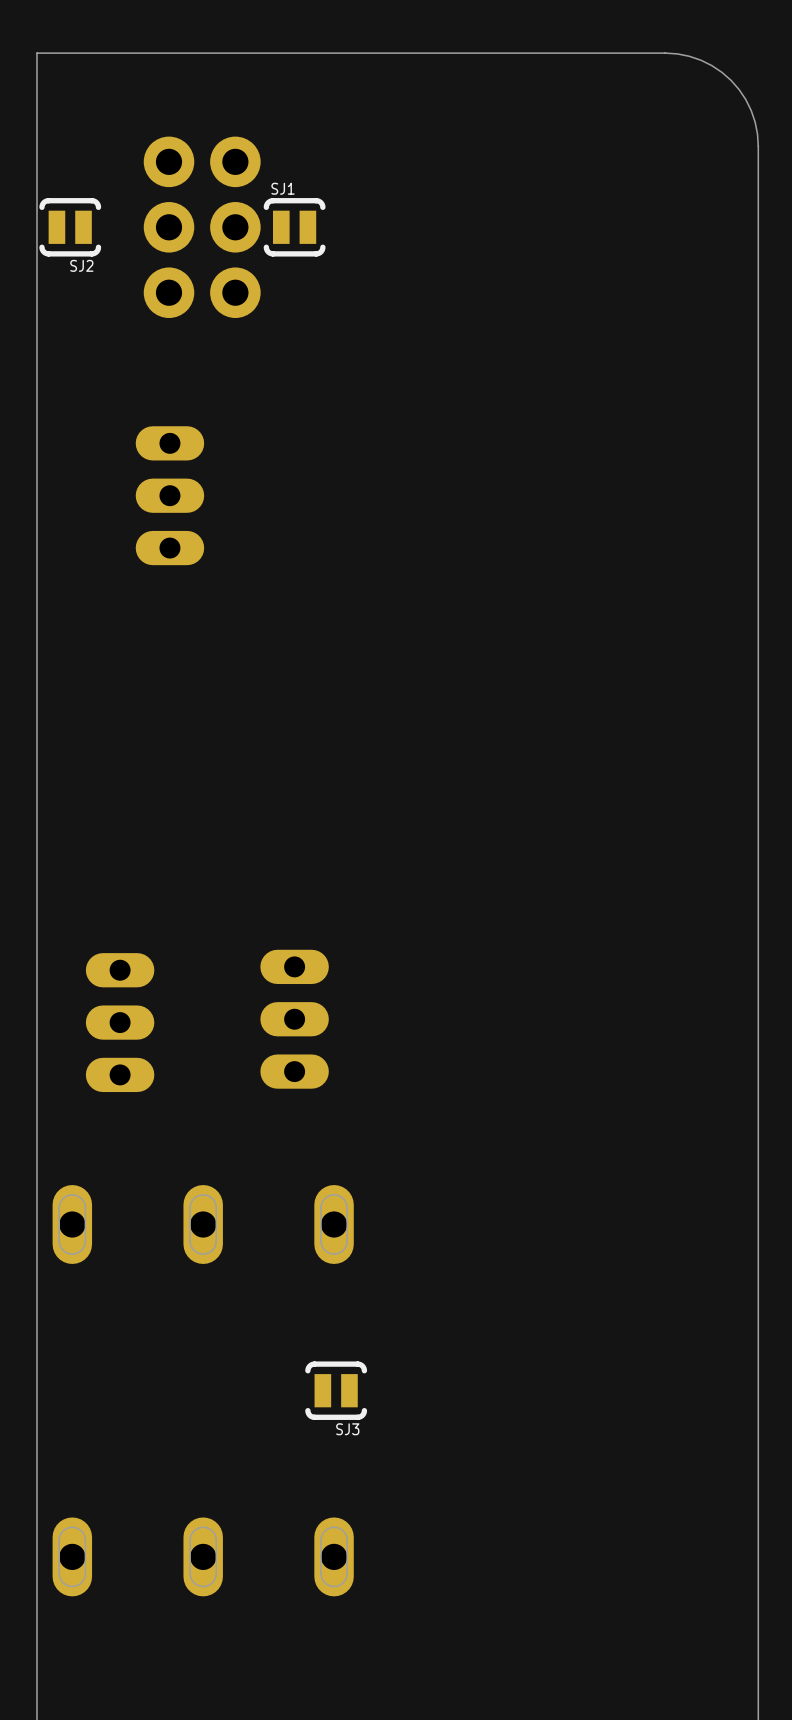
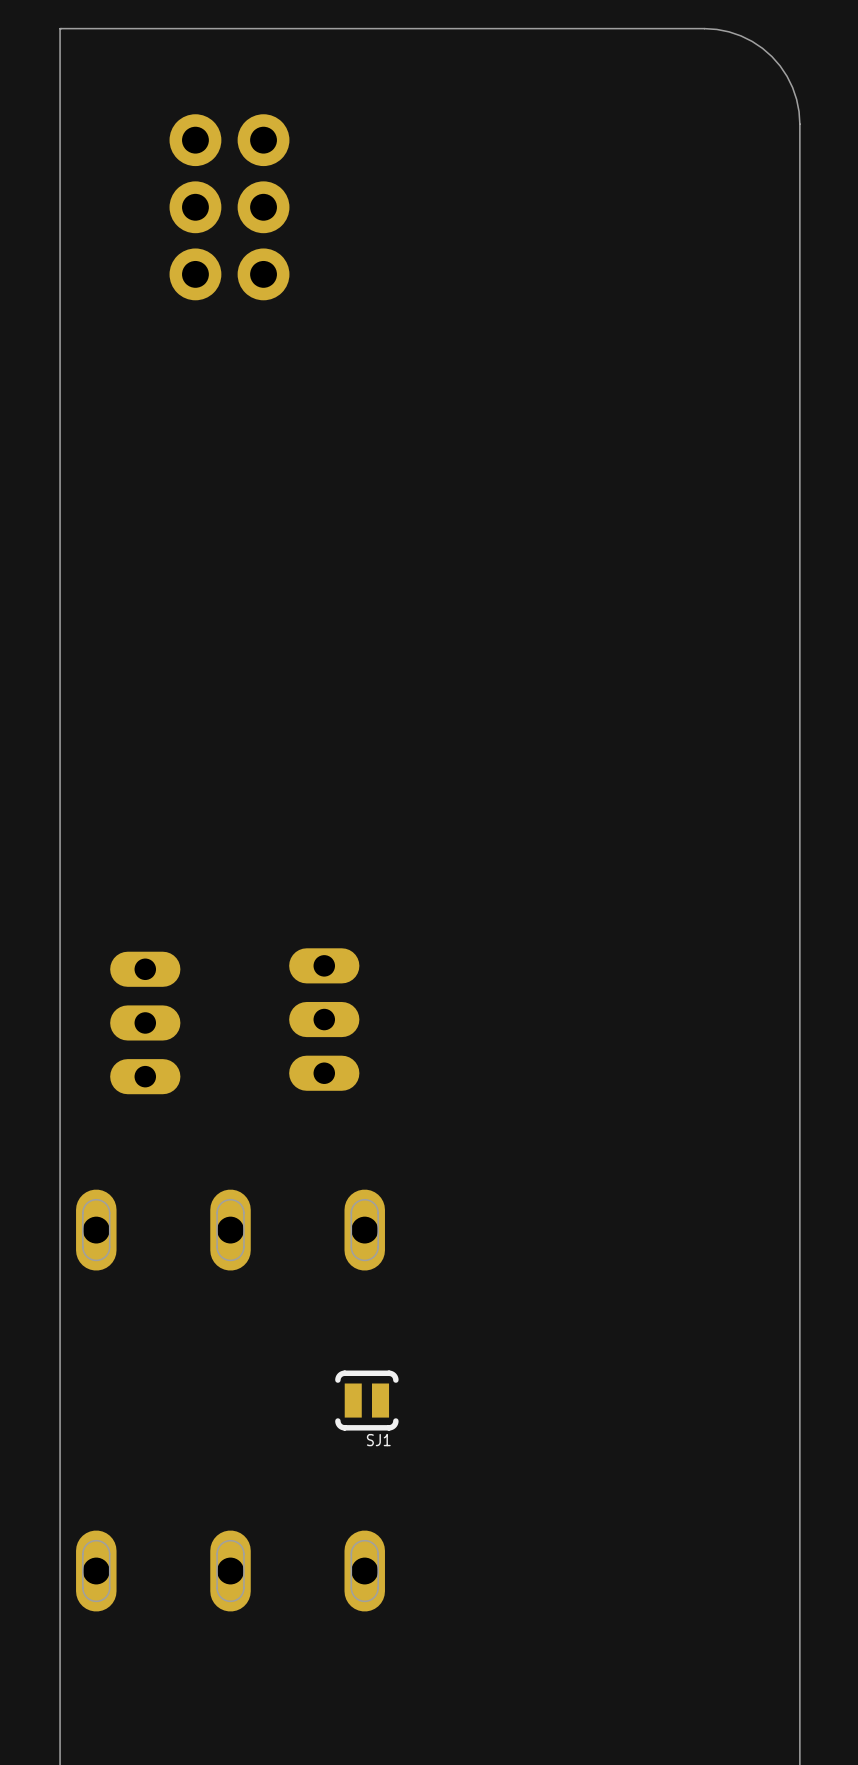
SJ2: (70, 227) -> none
SJ1: (294, 227) -> none
part: (169, 495) -> none
SJ3 name: SJ3 (347, 1429) -> SJ1 (378, 1440)

